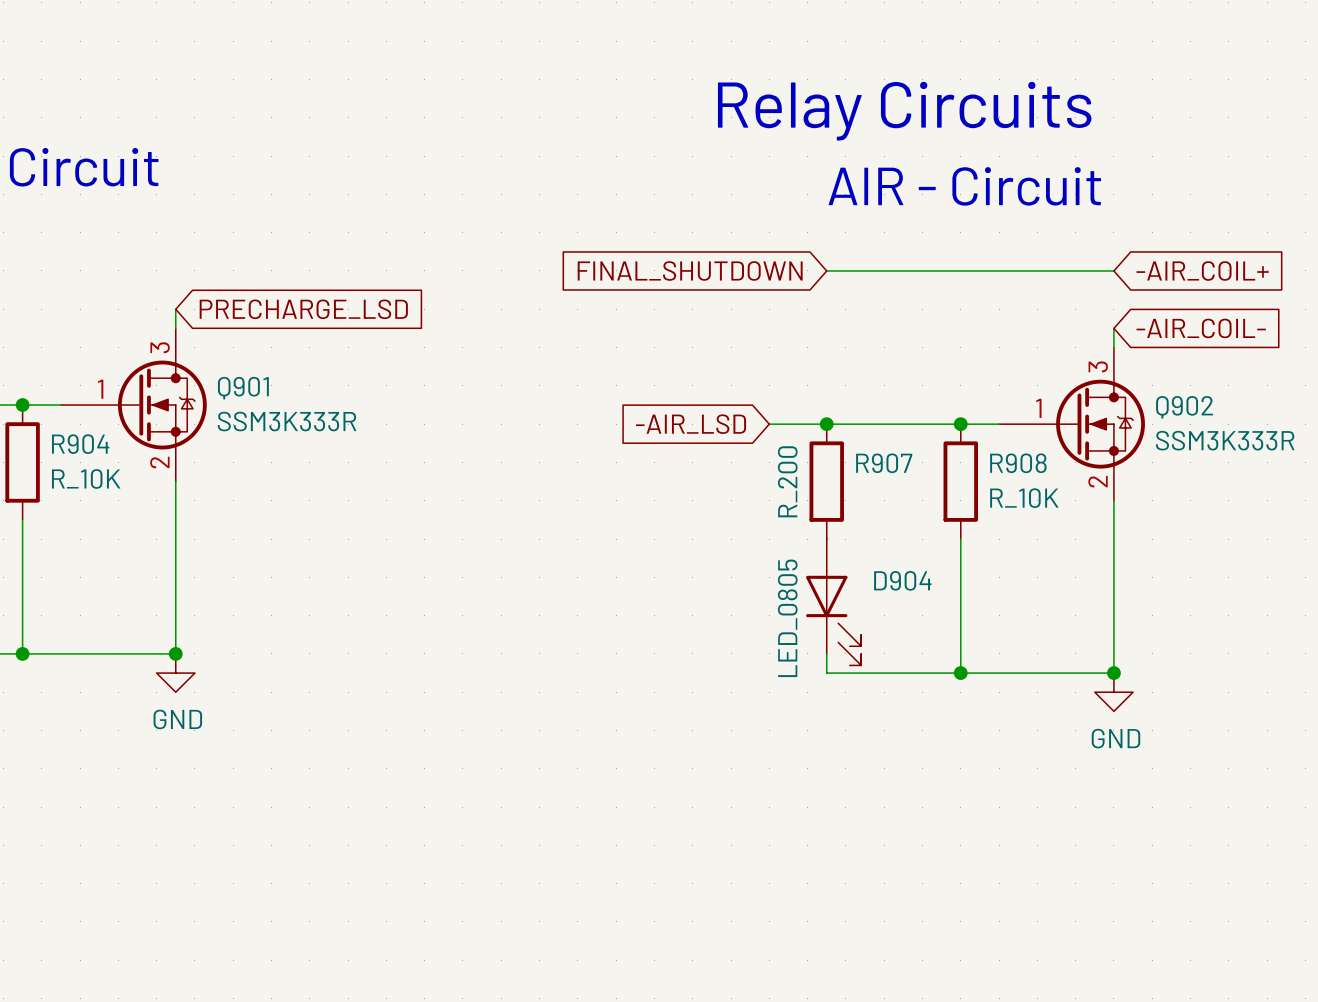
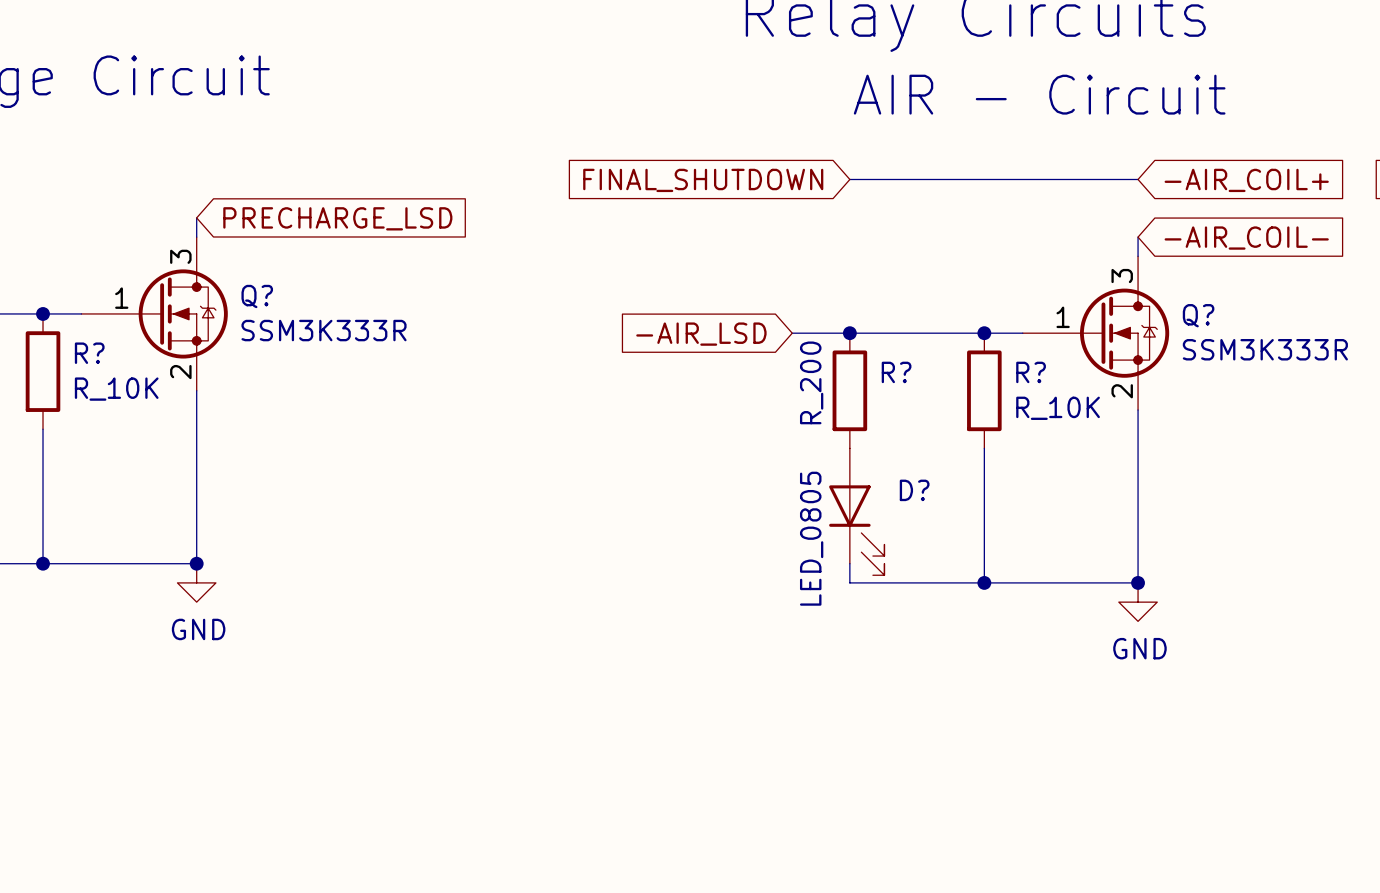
Q901 name: Q901 (243, 388) -> Q? (257, 296)
Q902 name: Q902 (1184, 407) -> Q? (1198, 315)
R904 name: R904 (80, 444) -> R? (89, 353)
R907 name: R907 (884, 463) -> R? (896, 372)
R908 name: R908 (1018, 463) -> R? (1031, 372)
D904 name: D904 (902, 580) -> D? (914, 490)

